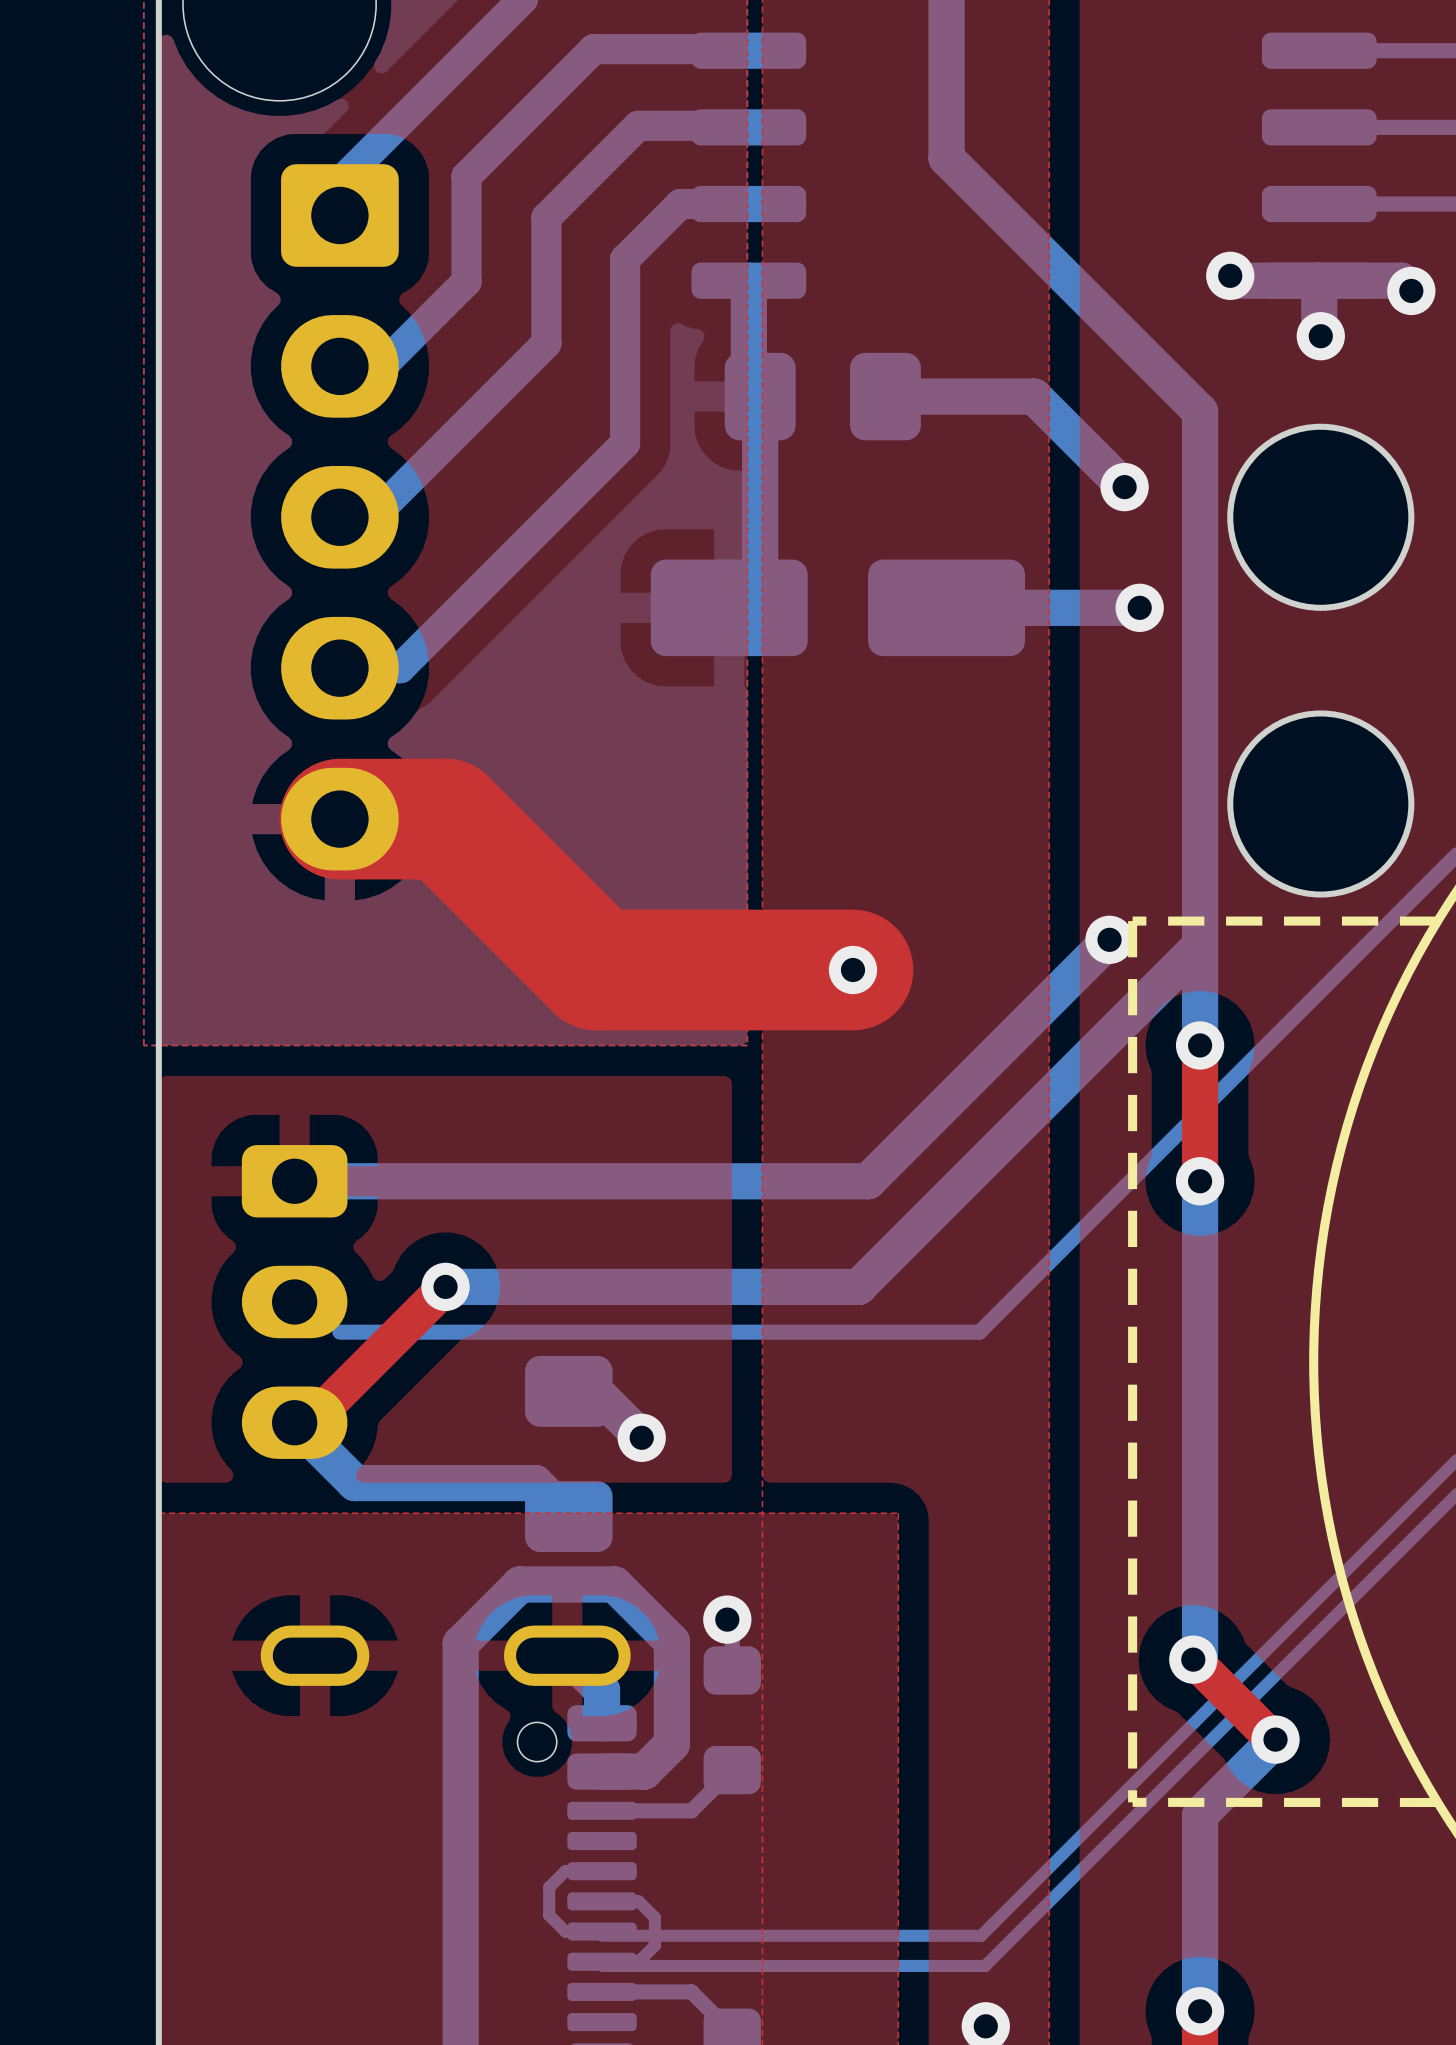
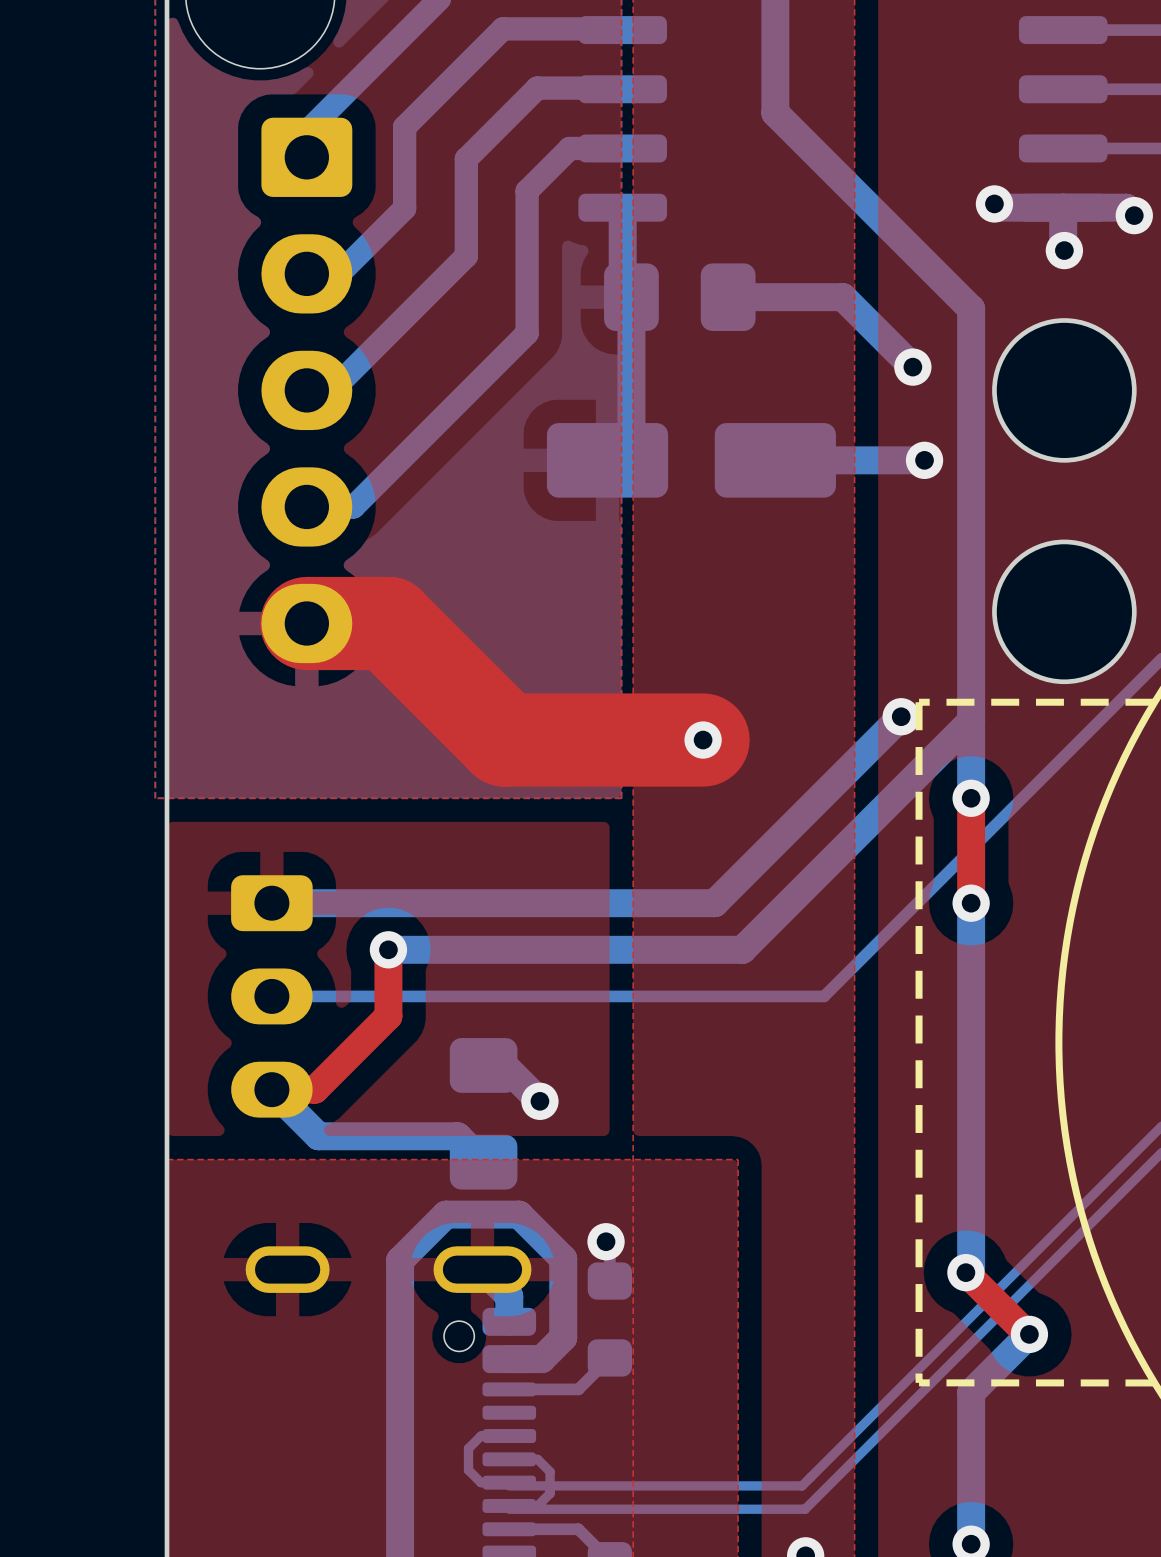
bottom track: (903, 1241) (858, 1286) (445, 1286) -> (742, 949) (388, 949)
top track: (445, 1286) (309, 1422) -> (388, 949) (388, 1016) (315, 1089) (283, 1089)
via position: (445, 1286) -> (388, 949)
bottom track: (1009, 1301) (979, 1332) (339, 1332) -> (824, 996) (271, 996)

